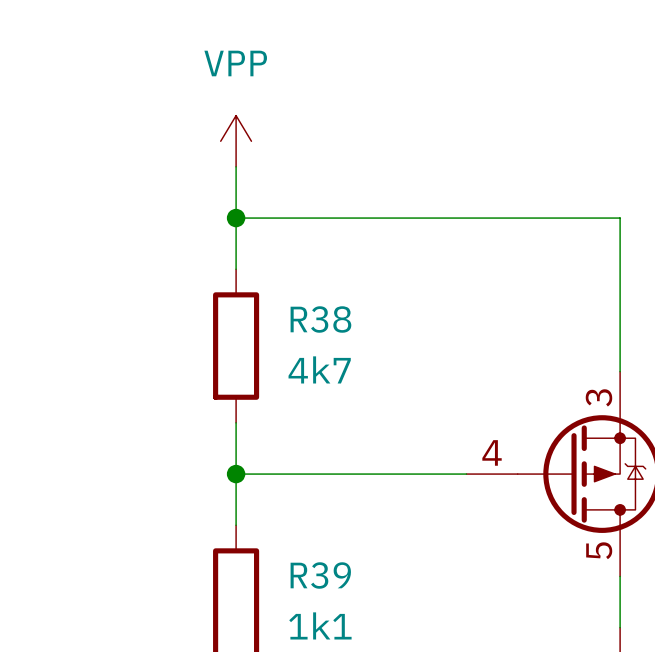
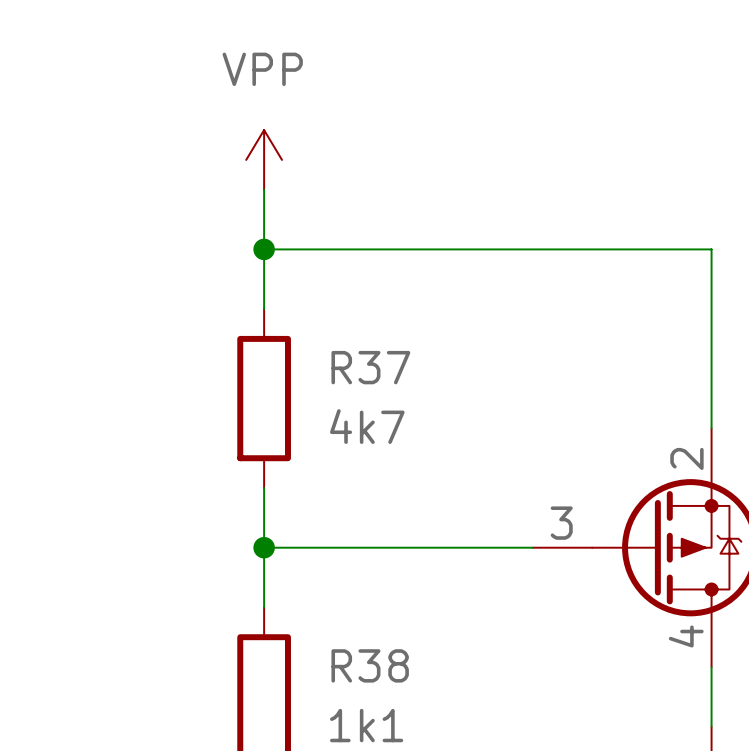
R38 name: R38 (320, 319) -> R37 (370, 367)
part pin number: 3 (598, 397) -> 2 (686, 458)
part pin number: 4 (492, 452) -> 3 (561, 523)
part pin number: 5 (599, 550) -> 4 (686, 636)
R39 name: R39 (320, 575) -> R38 (370, 665)

